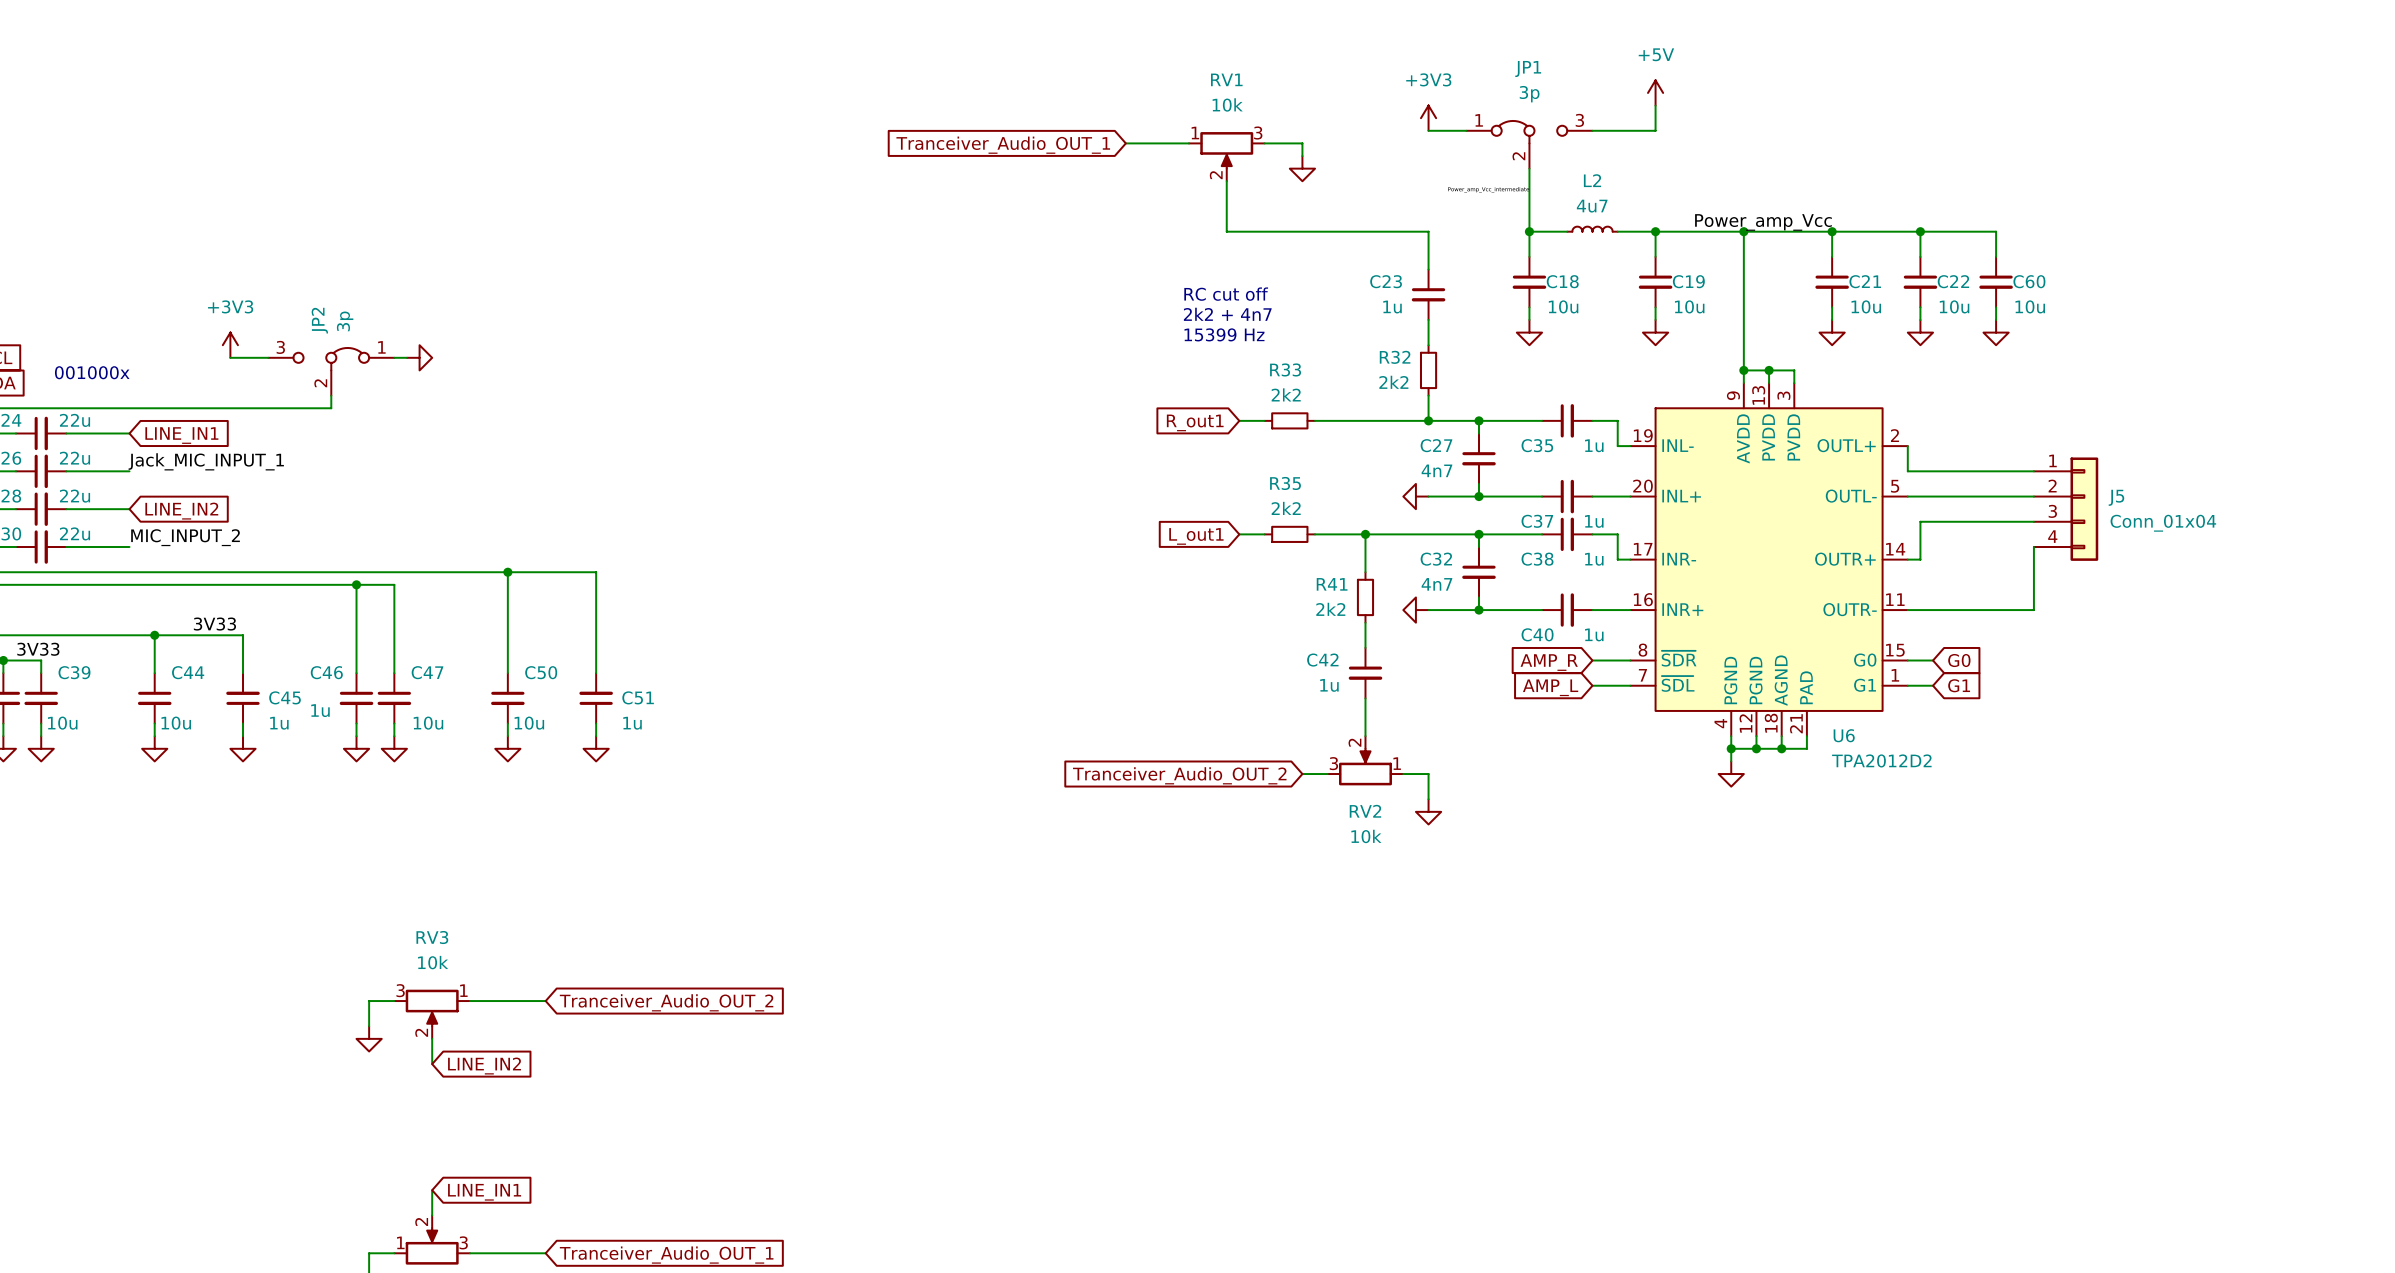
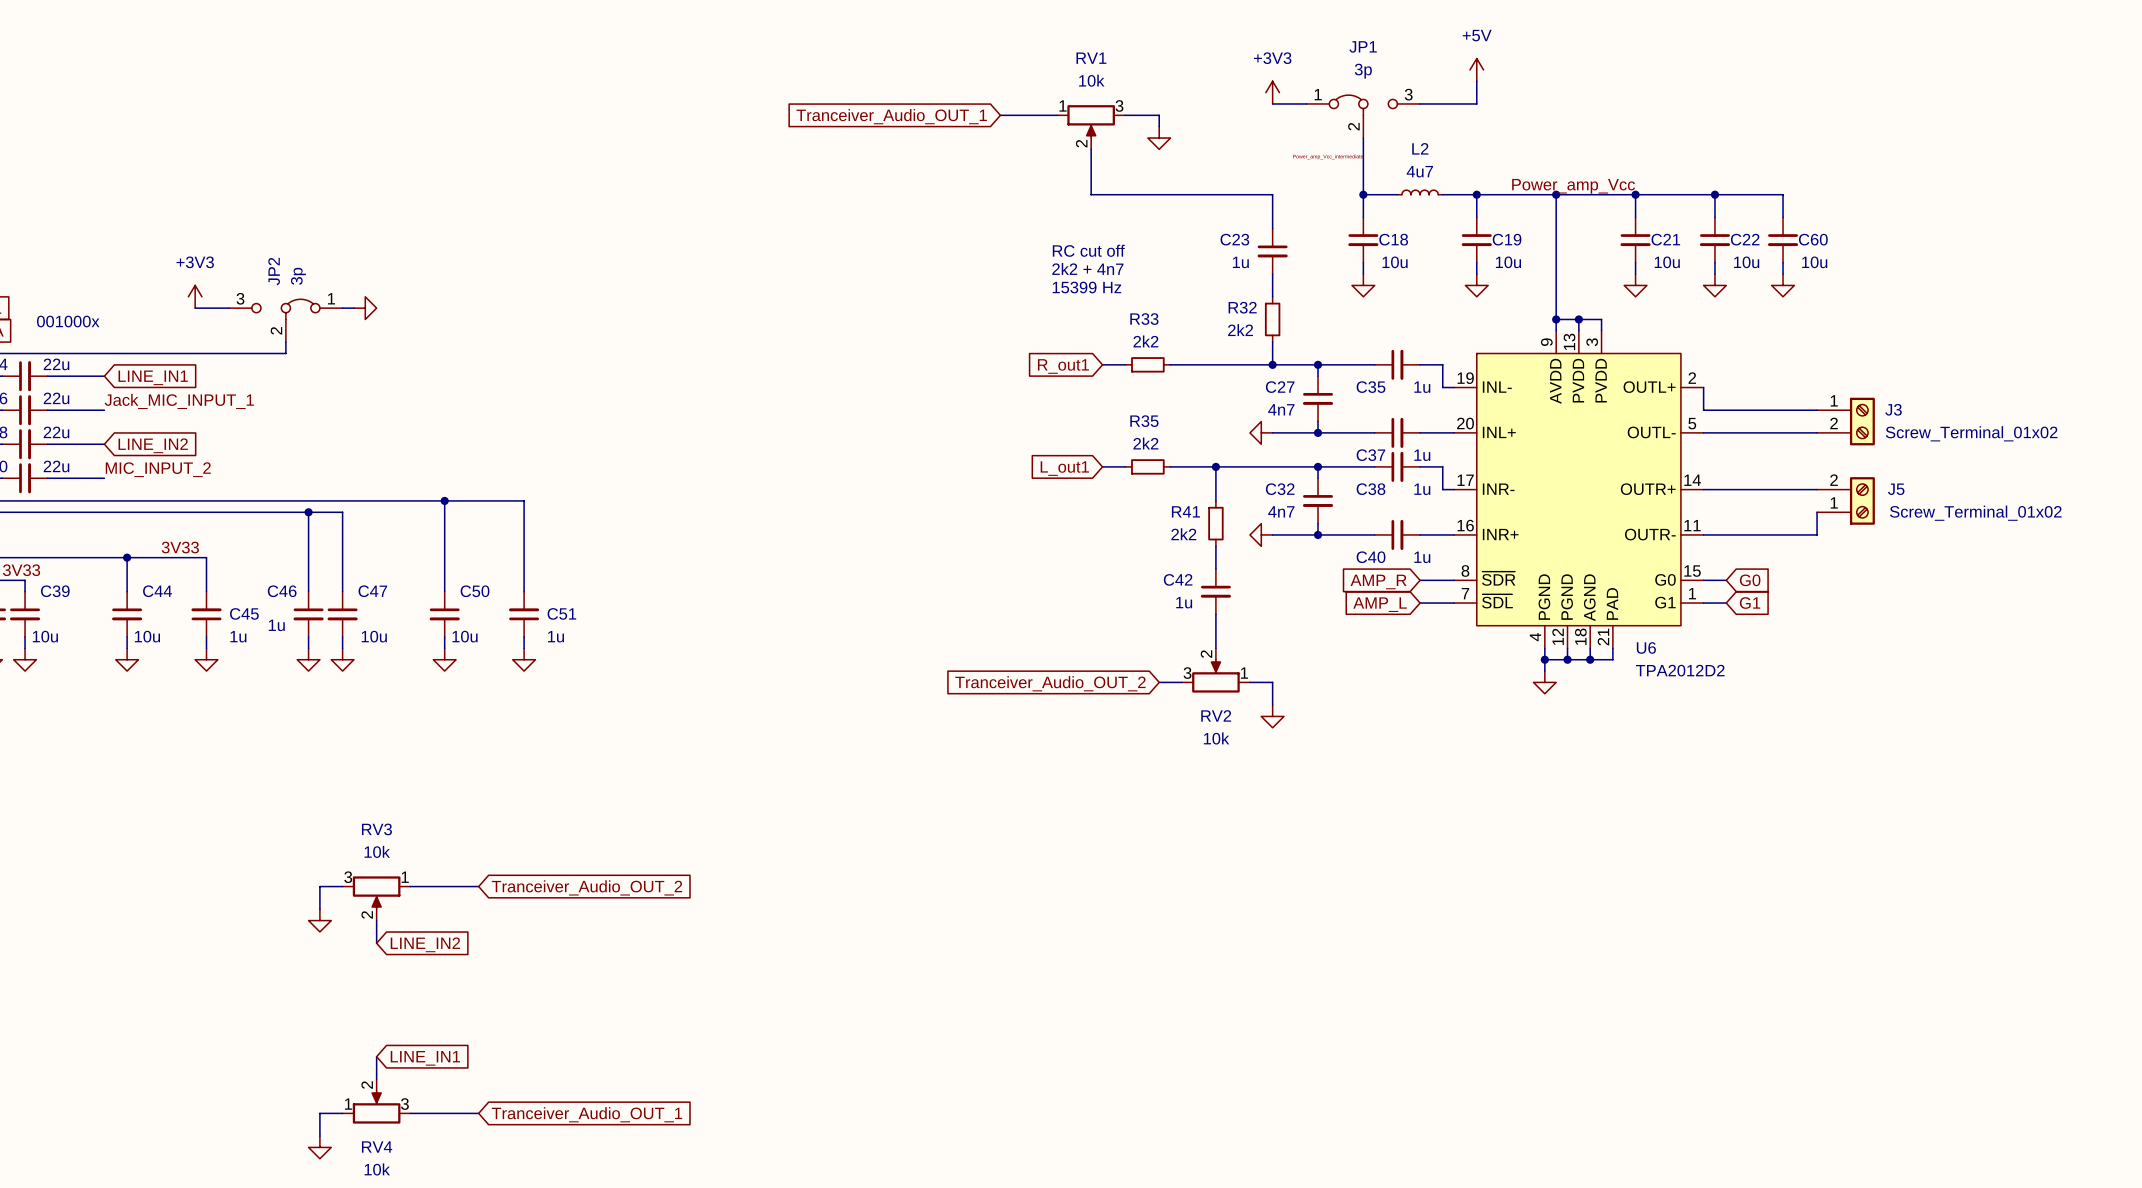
J5 symbol: [2033, 457, 2099, 561] -> [1817, 477, 1875, 525]
J3: none -> Screw_Terminal_01x02 (1845, 421)
wire: (2033, 521) (1920, 521) (1920, 559) -> (1817, 489) (1714, 489)
J5 value: Conn_01x04 (2163, 523) -> Screw_Terminal_01x02 (1975, 513)
wire: (2033, 547) (2033, 584) -> none

